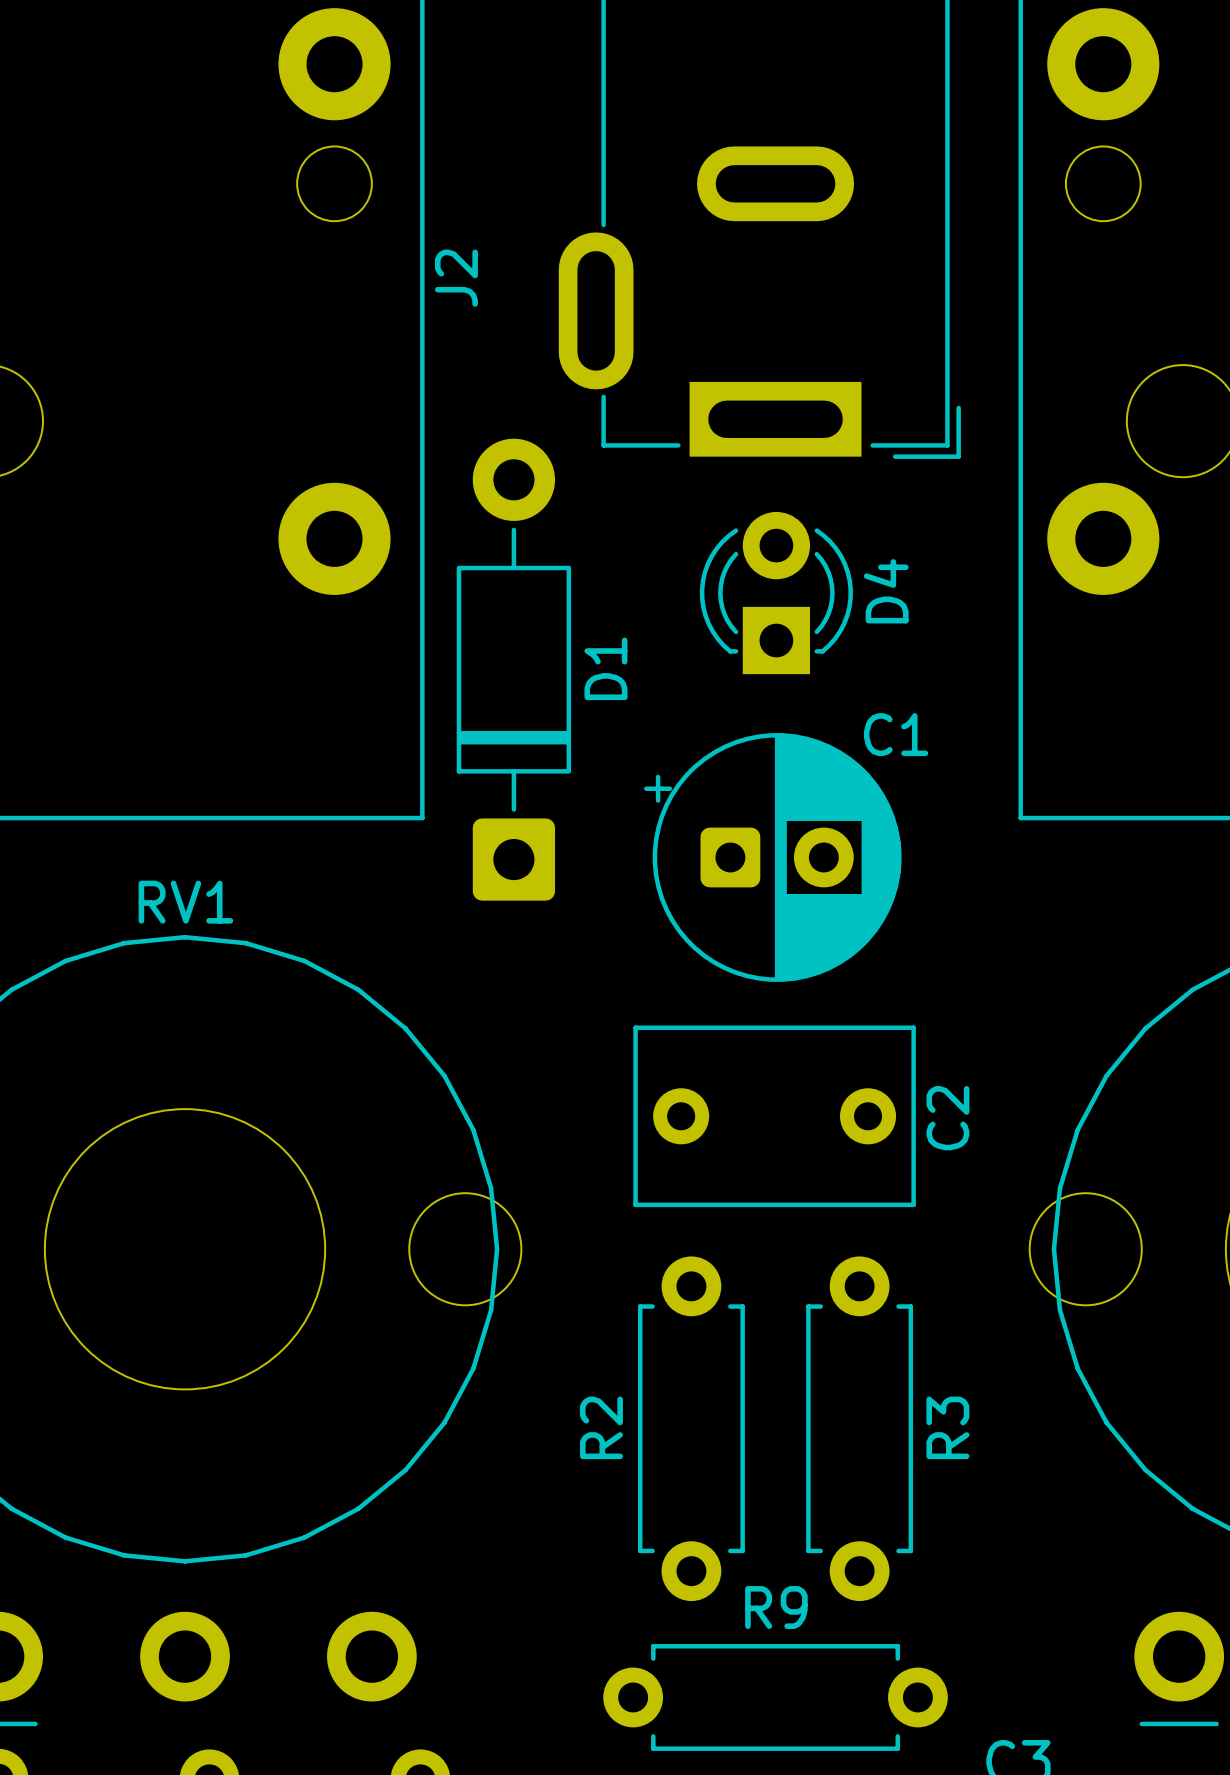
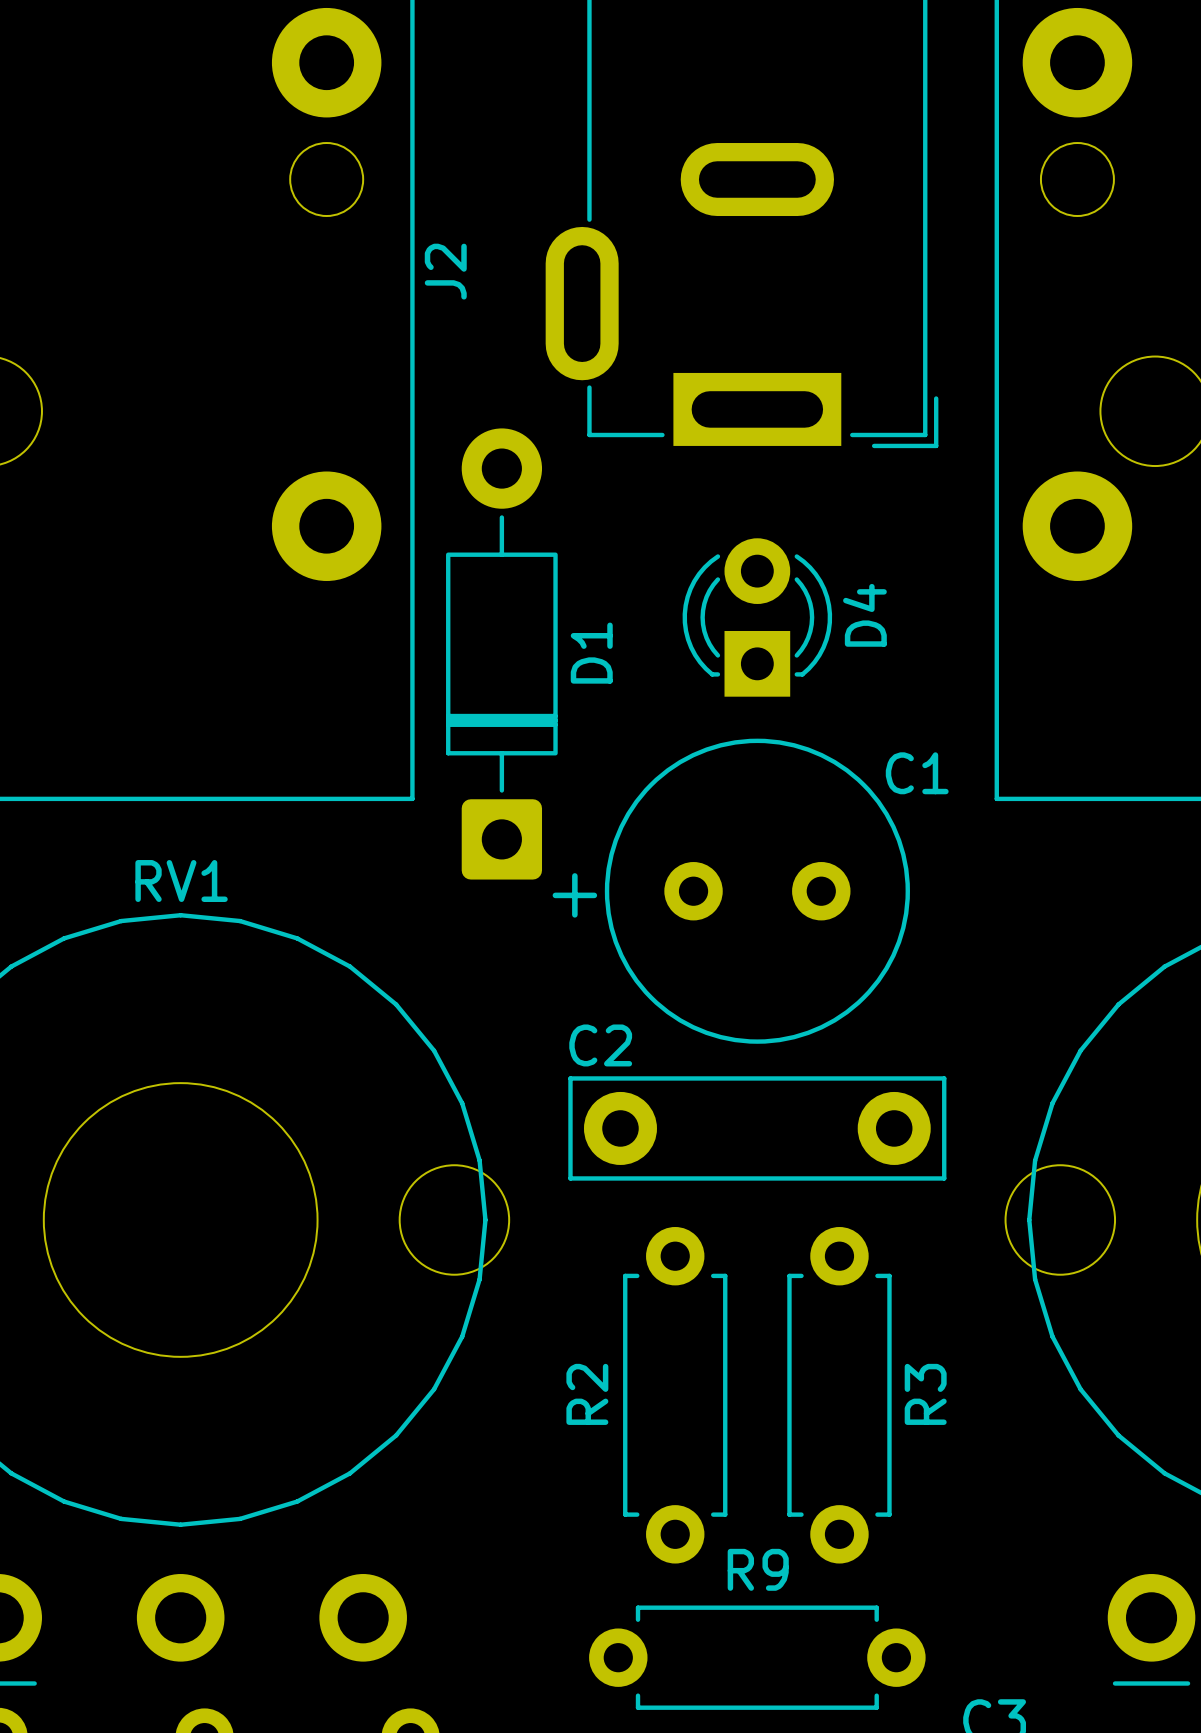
D4 position: (776, 593) -> (757, 617)
C1 footprint: [644, 733, 902, 982] -> [604, 738, 910, 1044]
text: none -> + (574, 895)
C2 footprint: [633, 1025, 916, 1208] -> [568, 1076, 947, 1181]
C2 name position: C2 (947, 1118) -> C2 (600, 1045)

